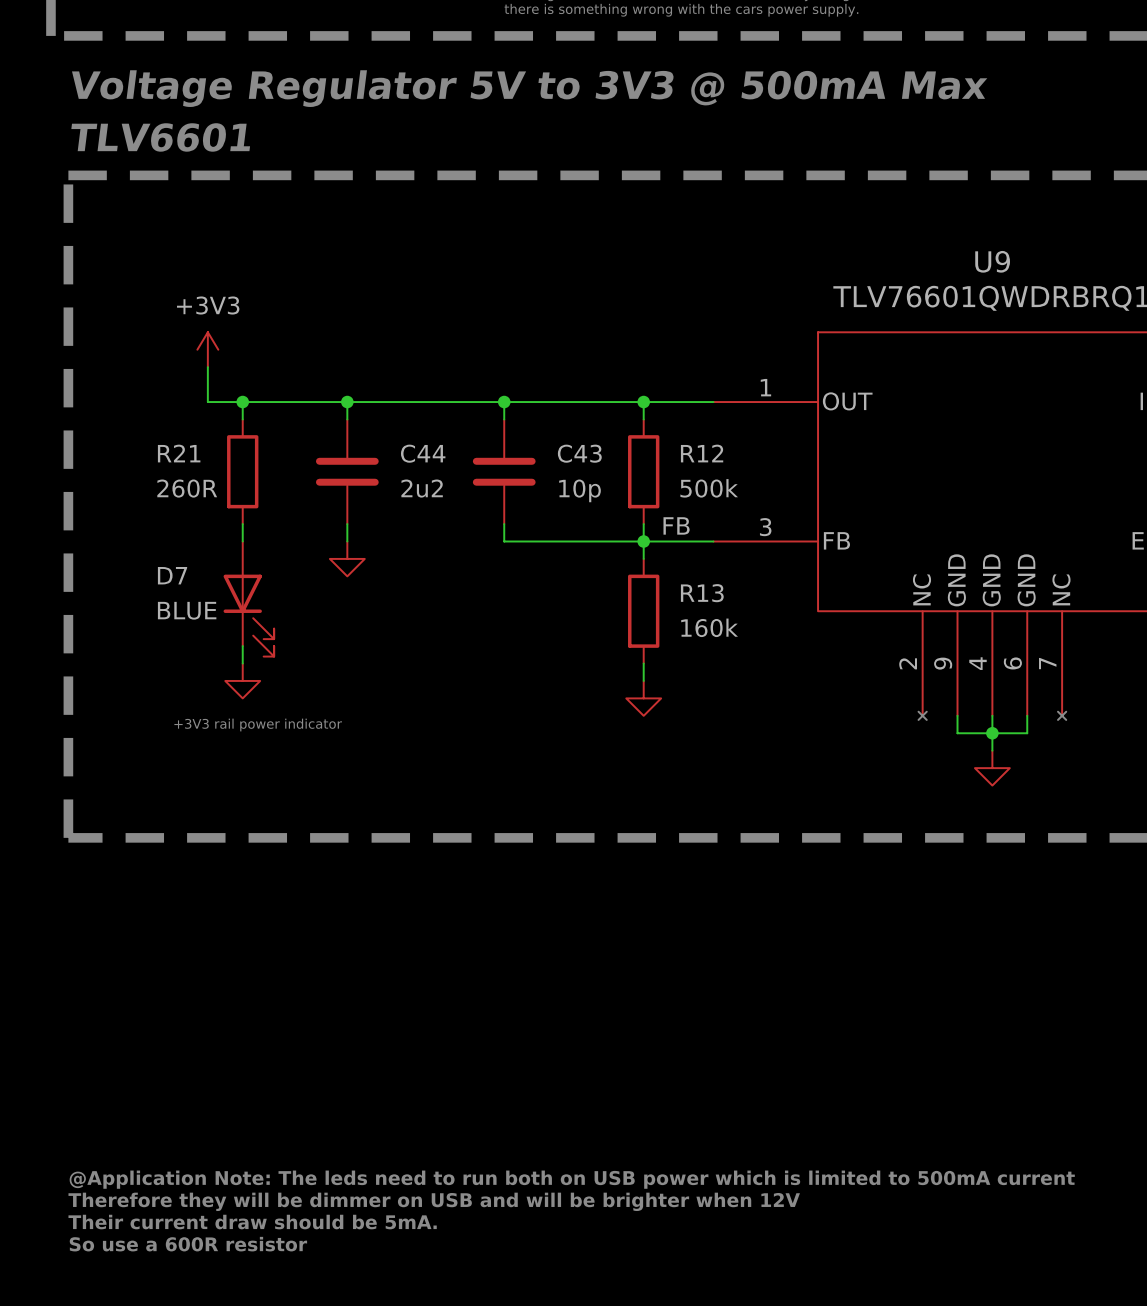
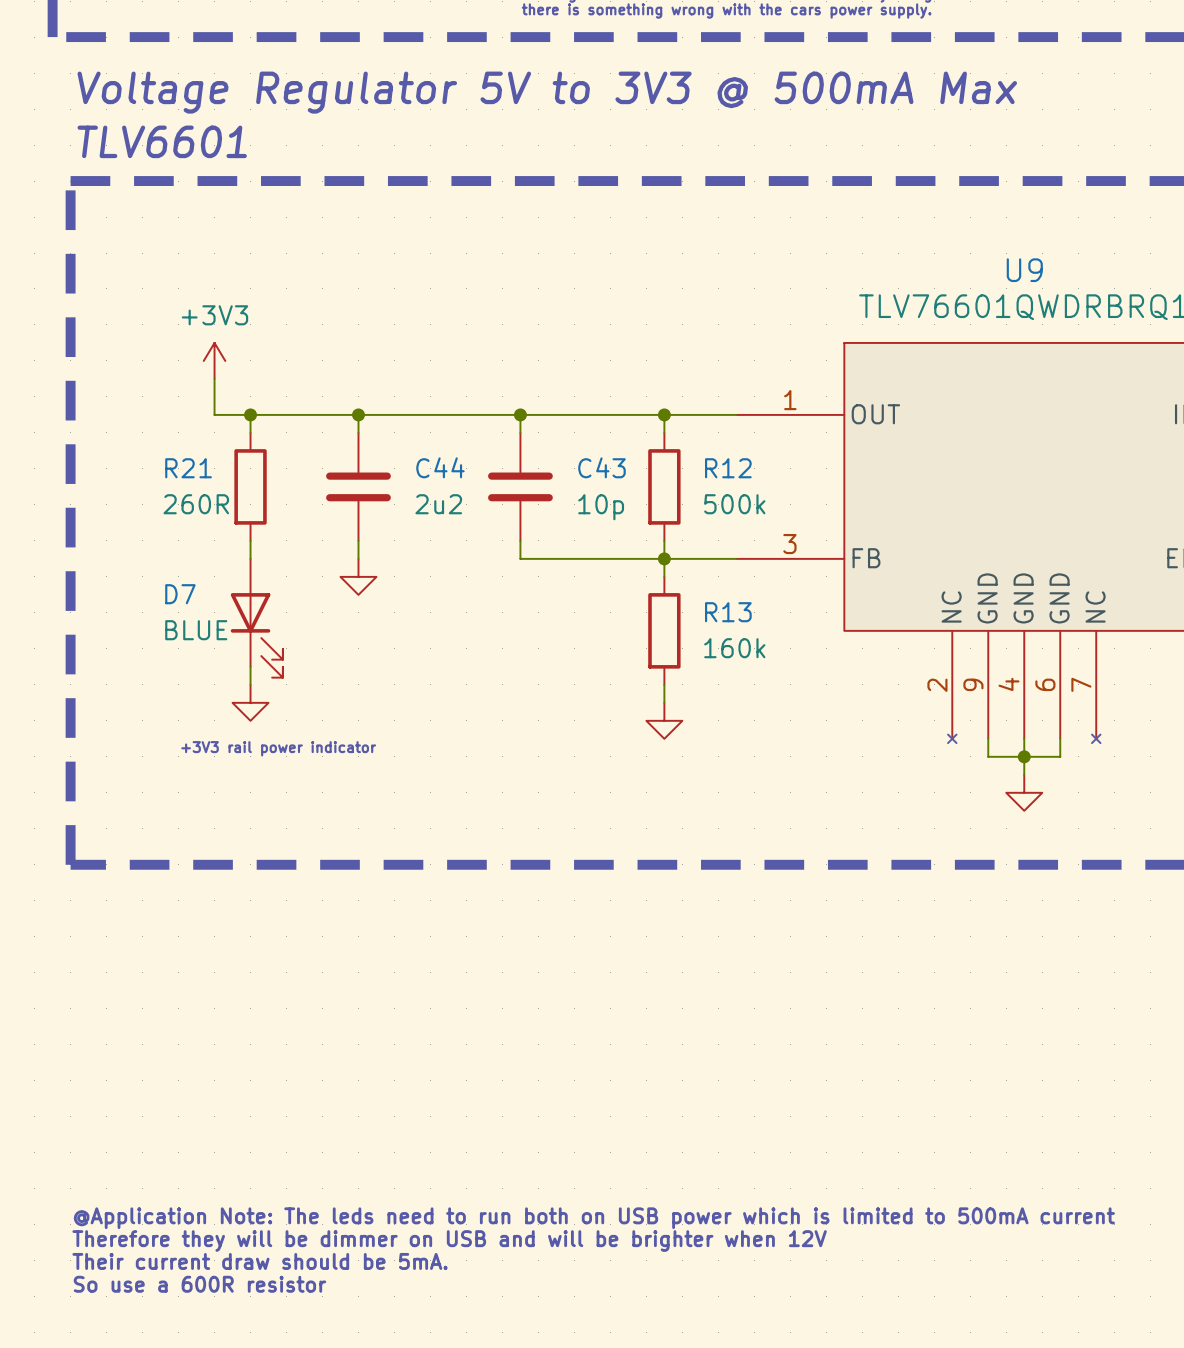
label: FB (676, 525) -> none

